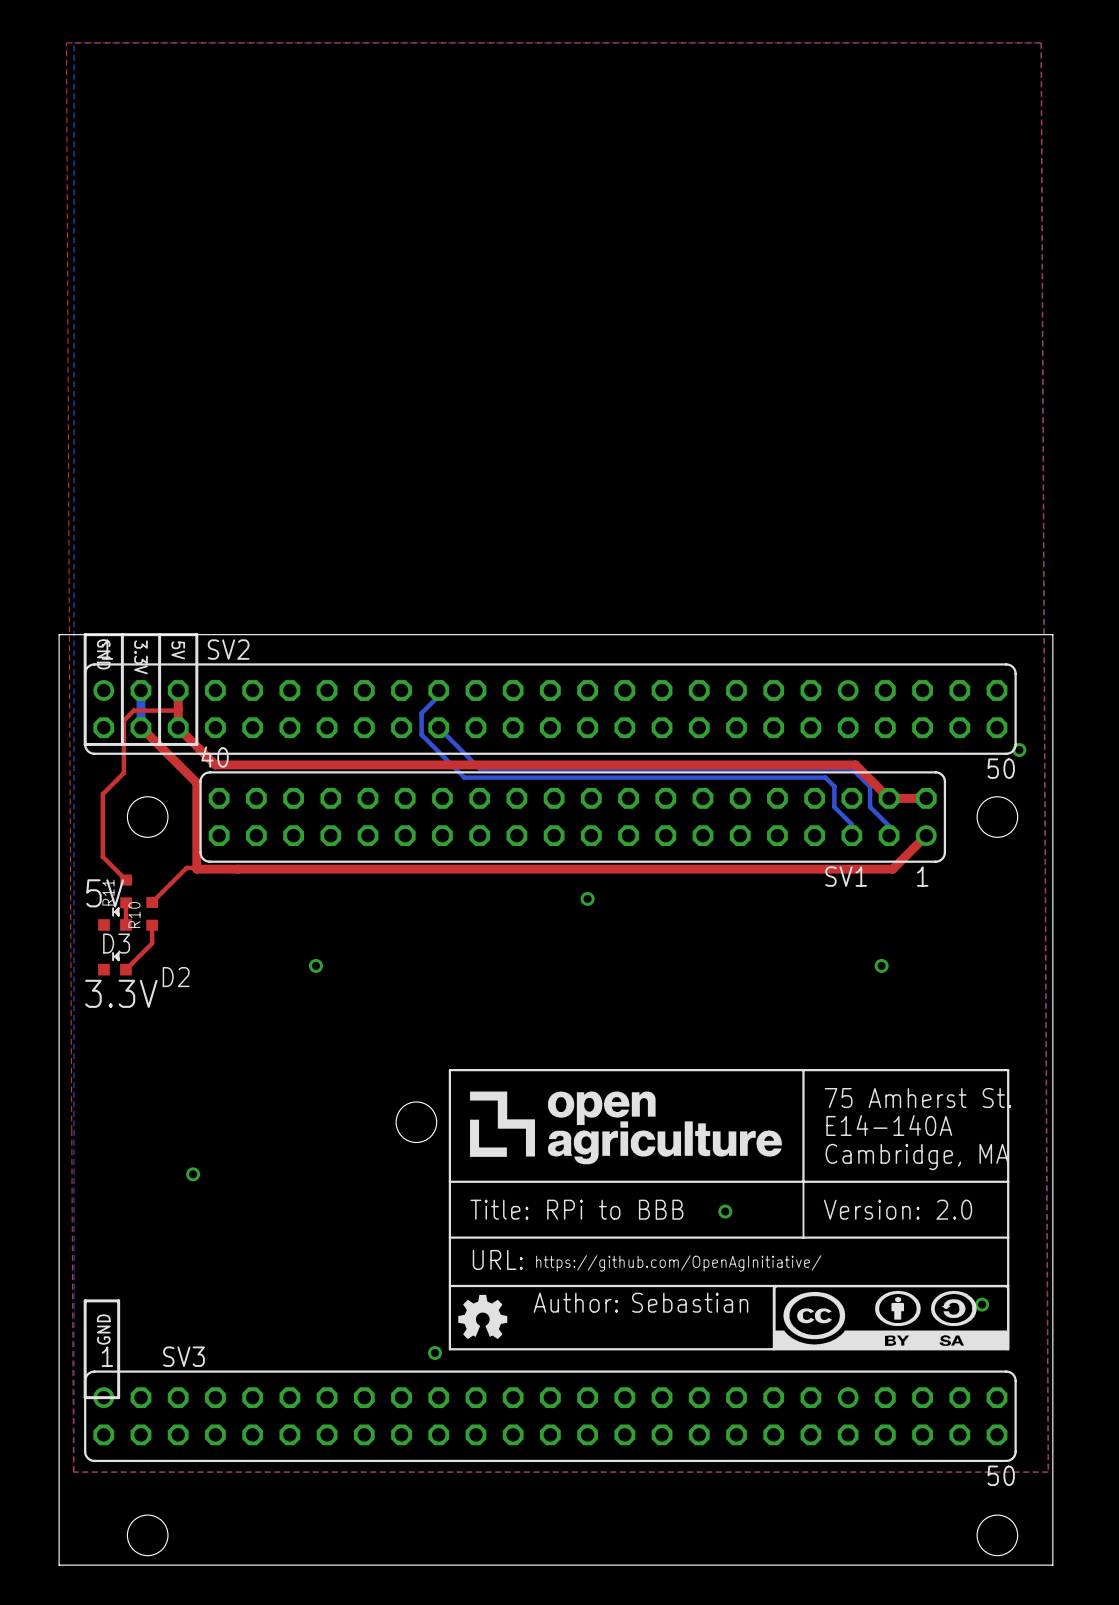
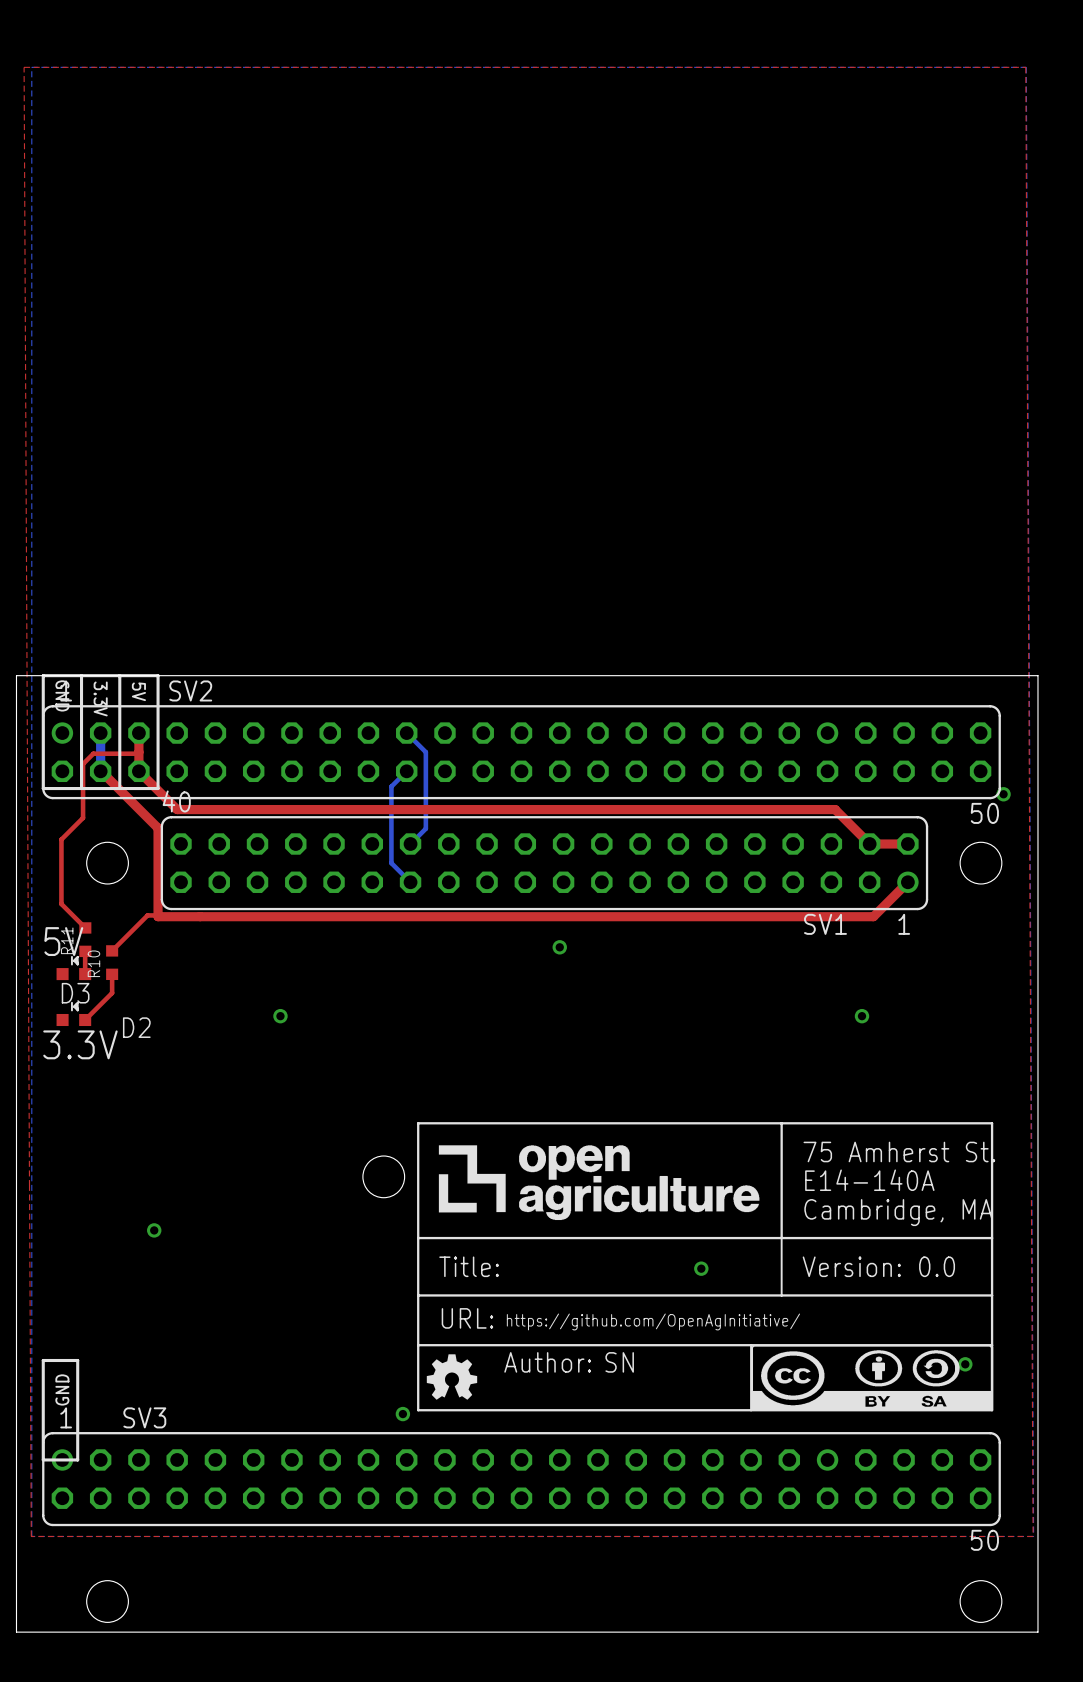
bottom track: (438, 690) (438, 696) (421, 713) (421, 734) (464, 777) (825, 777) (834, 786) (834, 806) (851, 824) (851, 835) -> (406, 733) (425, 752) (425, 828) (410, 844)
bottom track: (438, 727) (479, 768) (851, 768) (870, 786) (870, 807) (889, 825) (889, 835) -> (406, 771) (391, 786) (391, 863) (410, 882)
drawing shape: [448, 1069, 1012, 1351] -> [417, 1122, 996, 1412]

